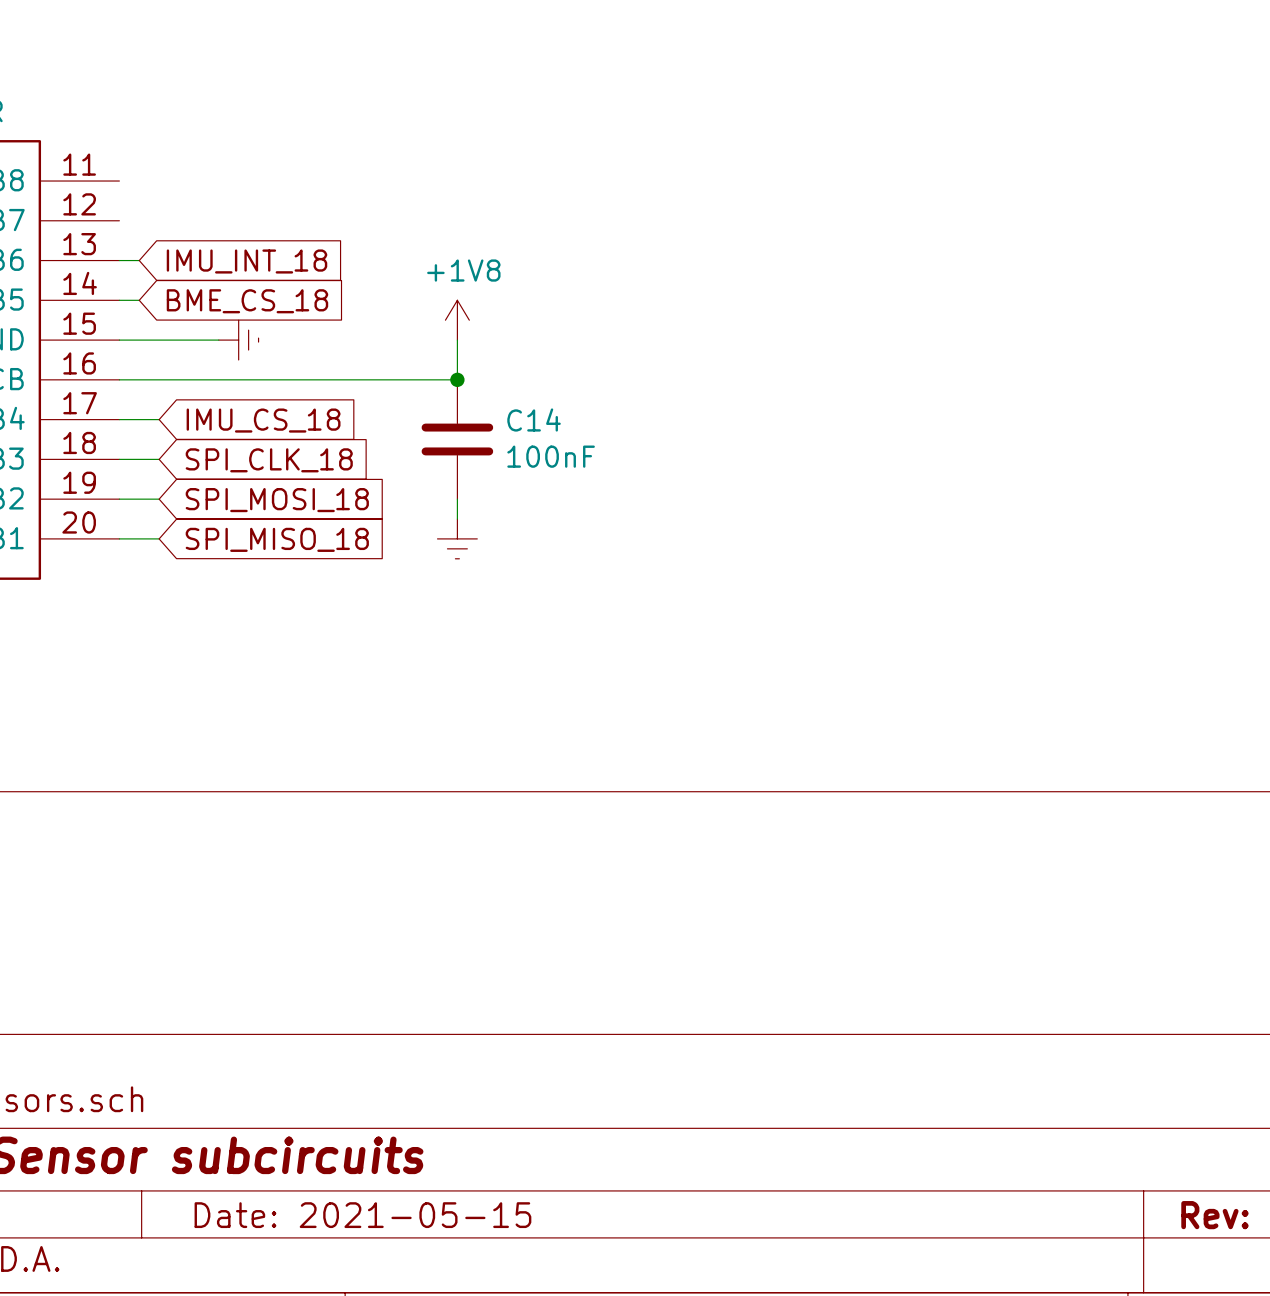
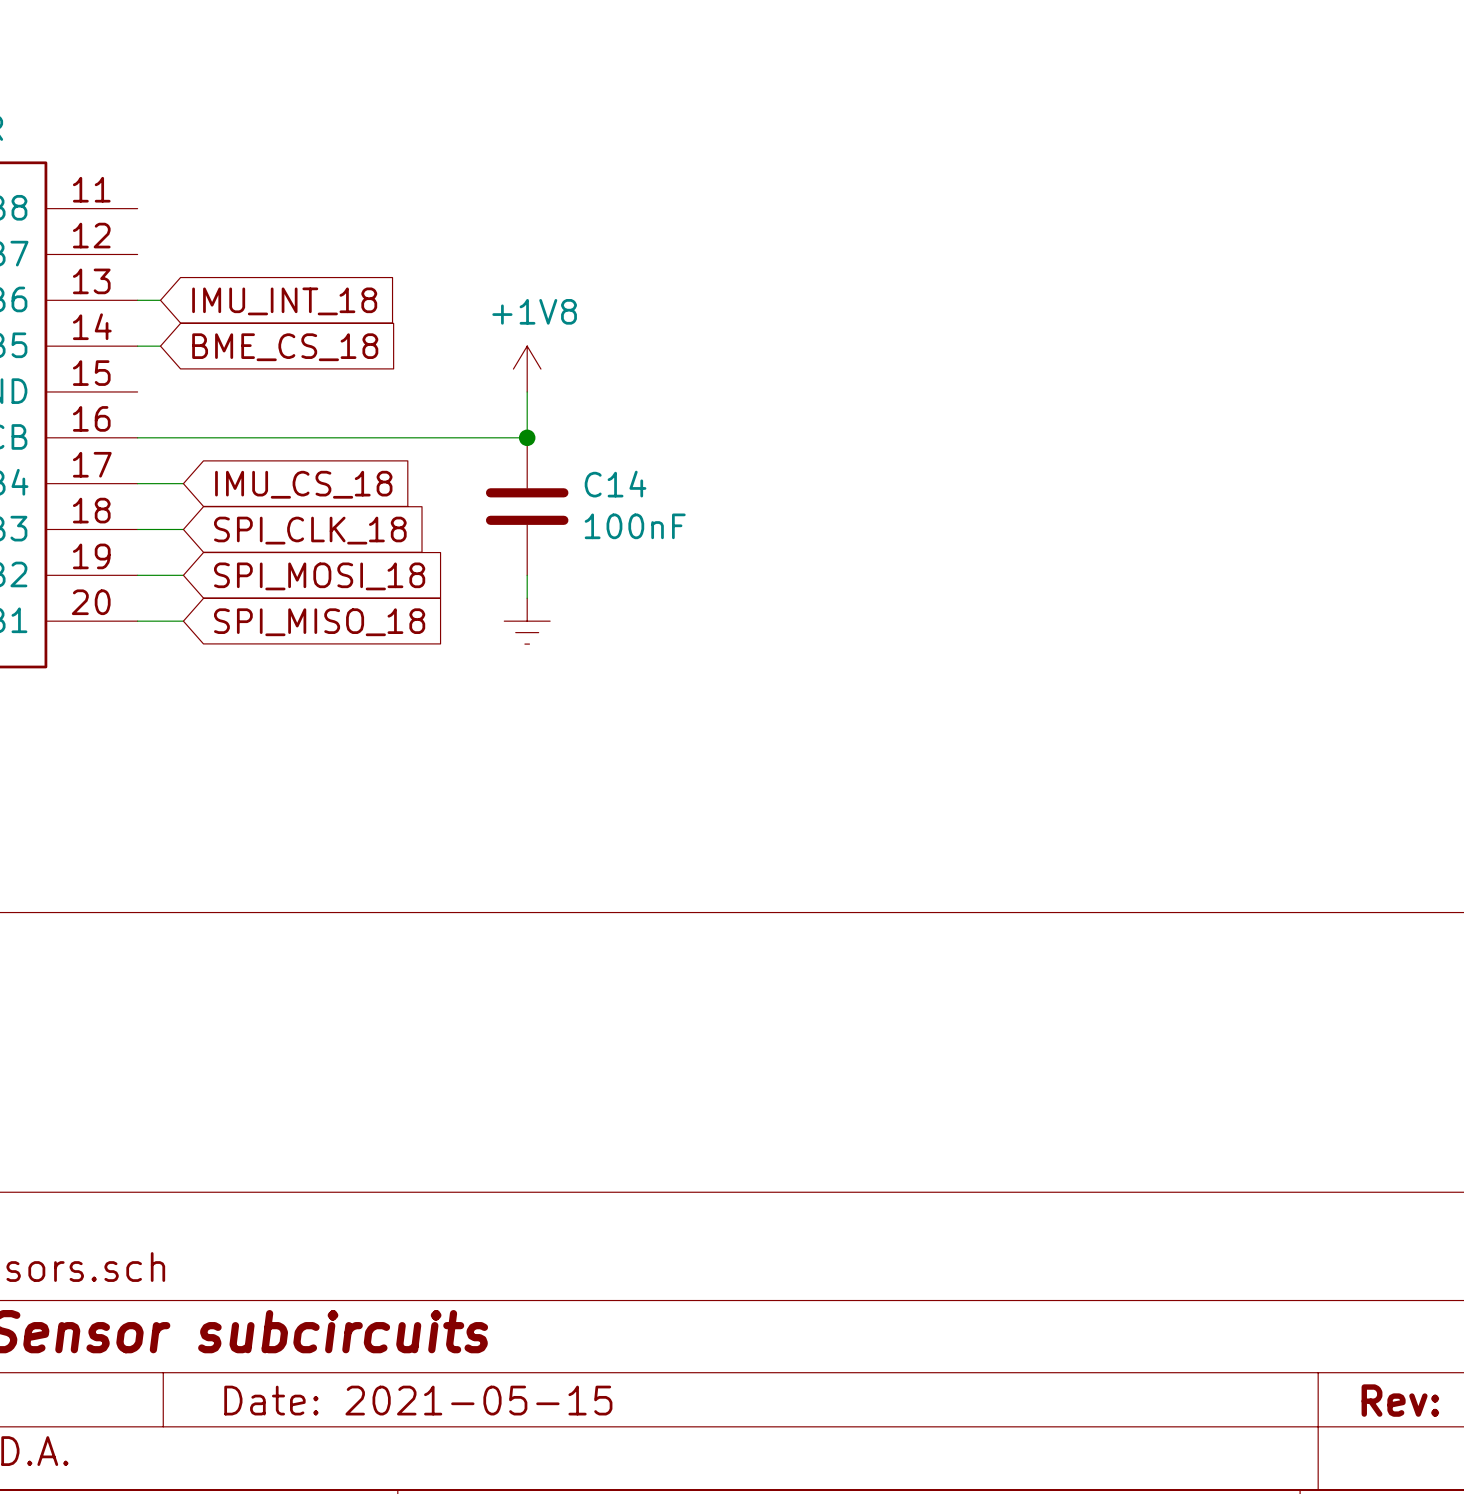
wire: (119, 340) (218, 340) -> none
power symbol: (238, 340) -> none

